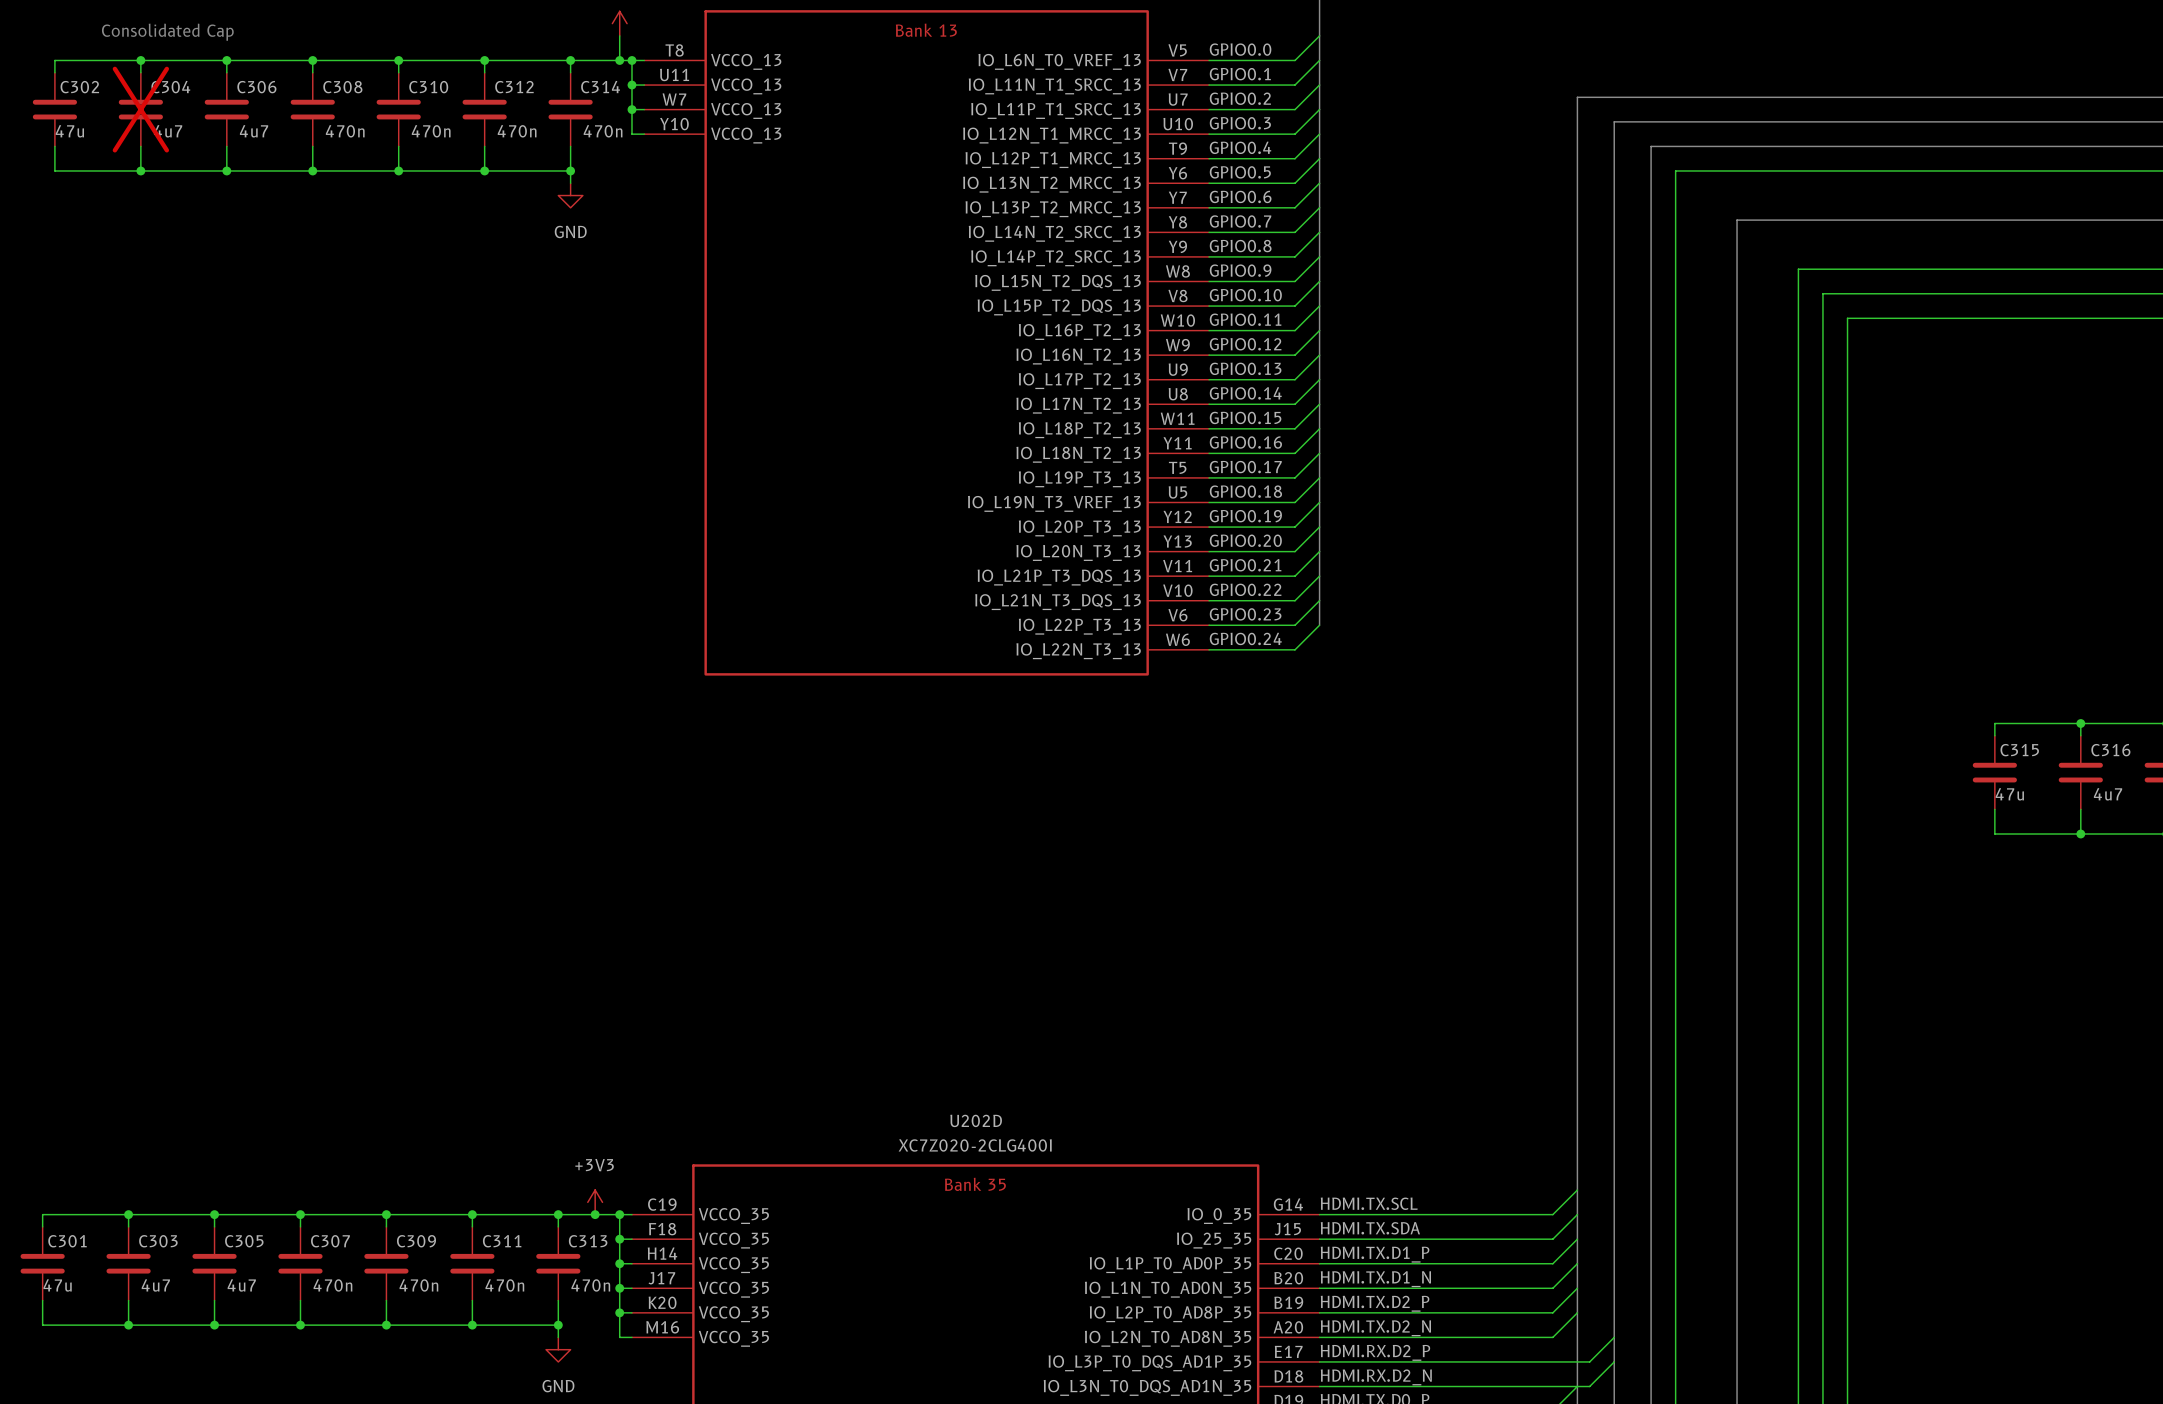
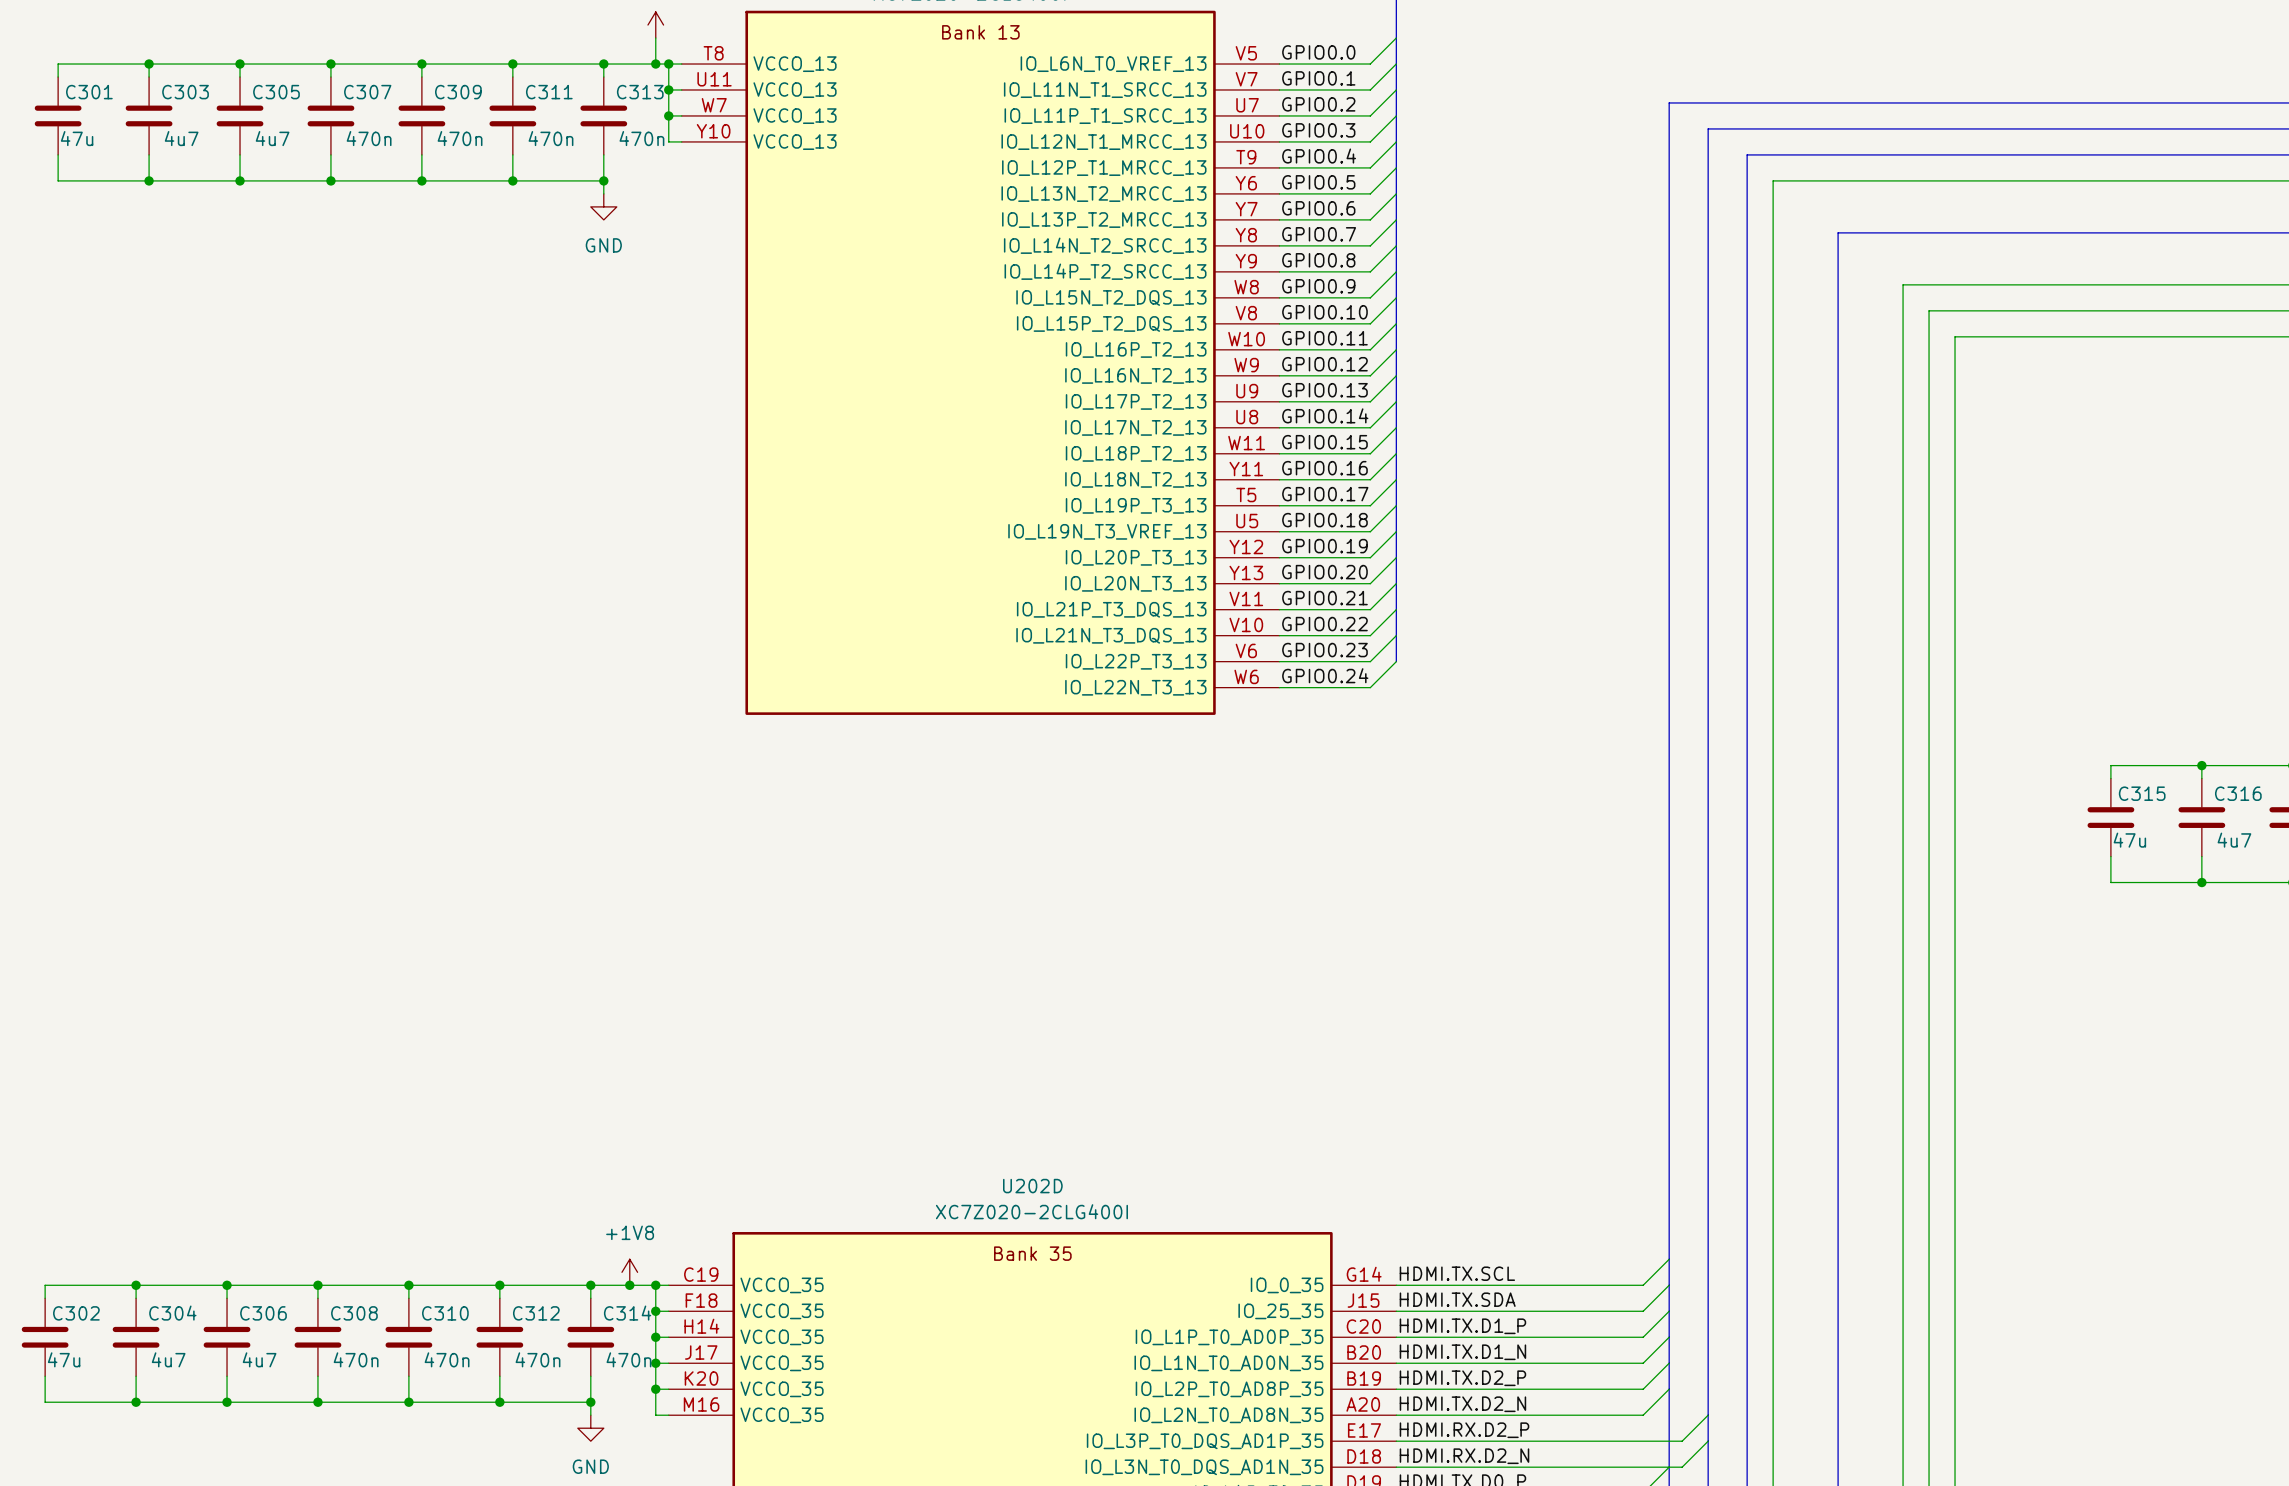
text: Consolidated Cap (167, 32) -> none
C302 name: C302 (79, 87) -> C301 (89, 92)
C304 name: C304 (170, 87) -> C303 (185, 92)
C306 name: C306 (256, 87) -> C305 (276, 92)
C308 name: C308 (342, 87) -> C307 (367, 92)
C310 name: C310 (428, 87) -> C309 (458, 92)
C312 name: C312 (514, 87) -> C311 (549, 92)
C314 name: C314 (600, 87) -> C313 (640, 92)
C304 do-not-place cross: (140, 109) -> none
power symbol: +3V3 (595, 1202) -> +1V8 (629, 1272)
C301 name: C301 (67, 1241) -> C302 (76, 1313)
C303 name: C303 (158, 1241) -> C304 (172, 1313)
C305 name: C305 (244, 1241) -> C306 (263, 1313)
C307 name: C307 (330, 1241) -> C308 (354, 1313)
C309 name: C309 (416, 1241) -> C310 (445, 1313)
C311 name: C311 (502, 1241) -> C312 (536, 1313)
C313 name: C313 (588, 1241) -> C314 (627, 1313)

